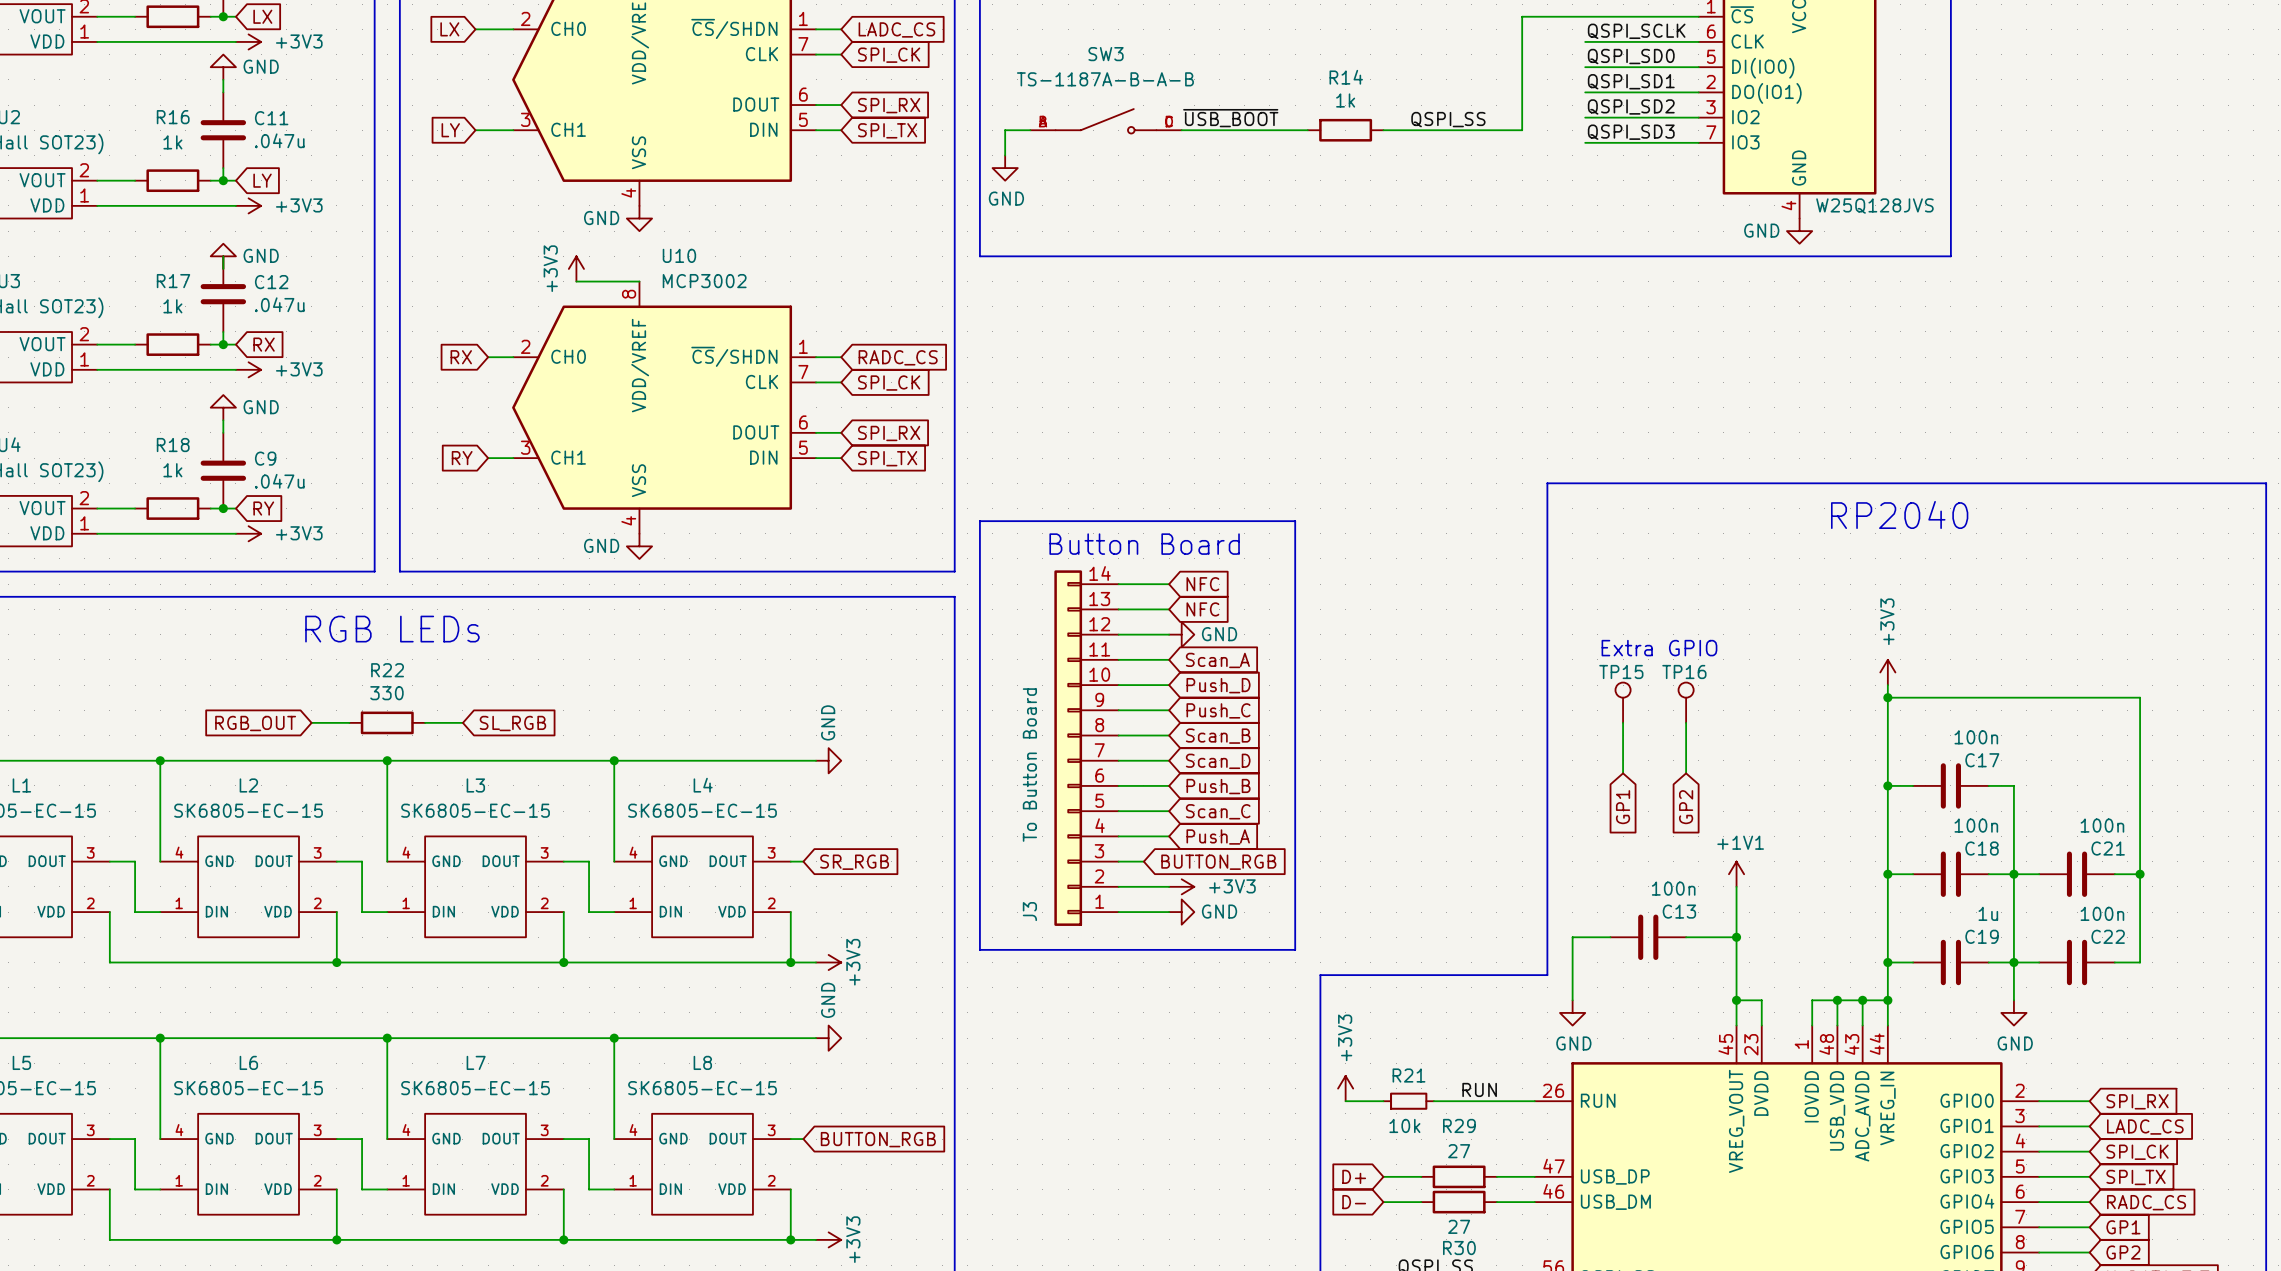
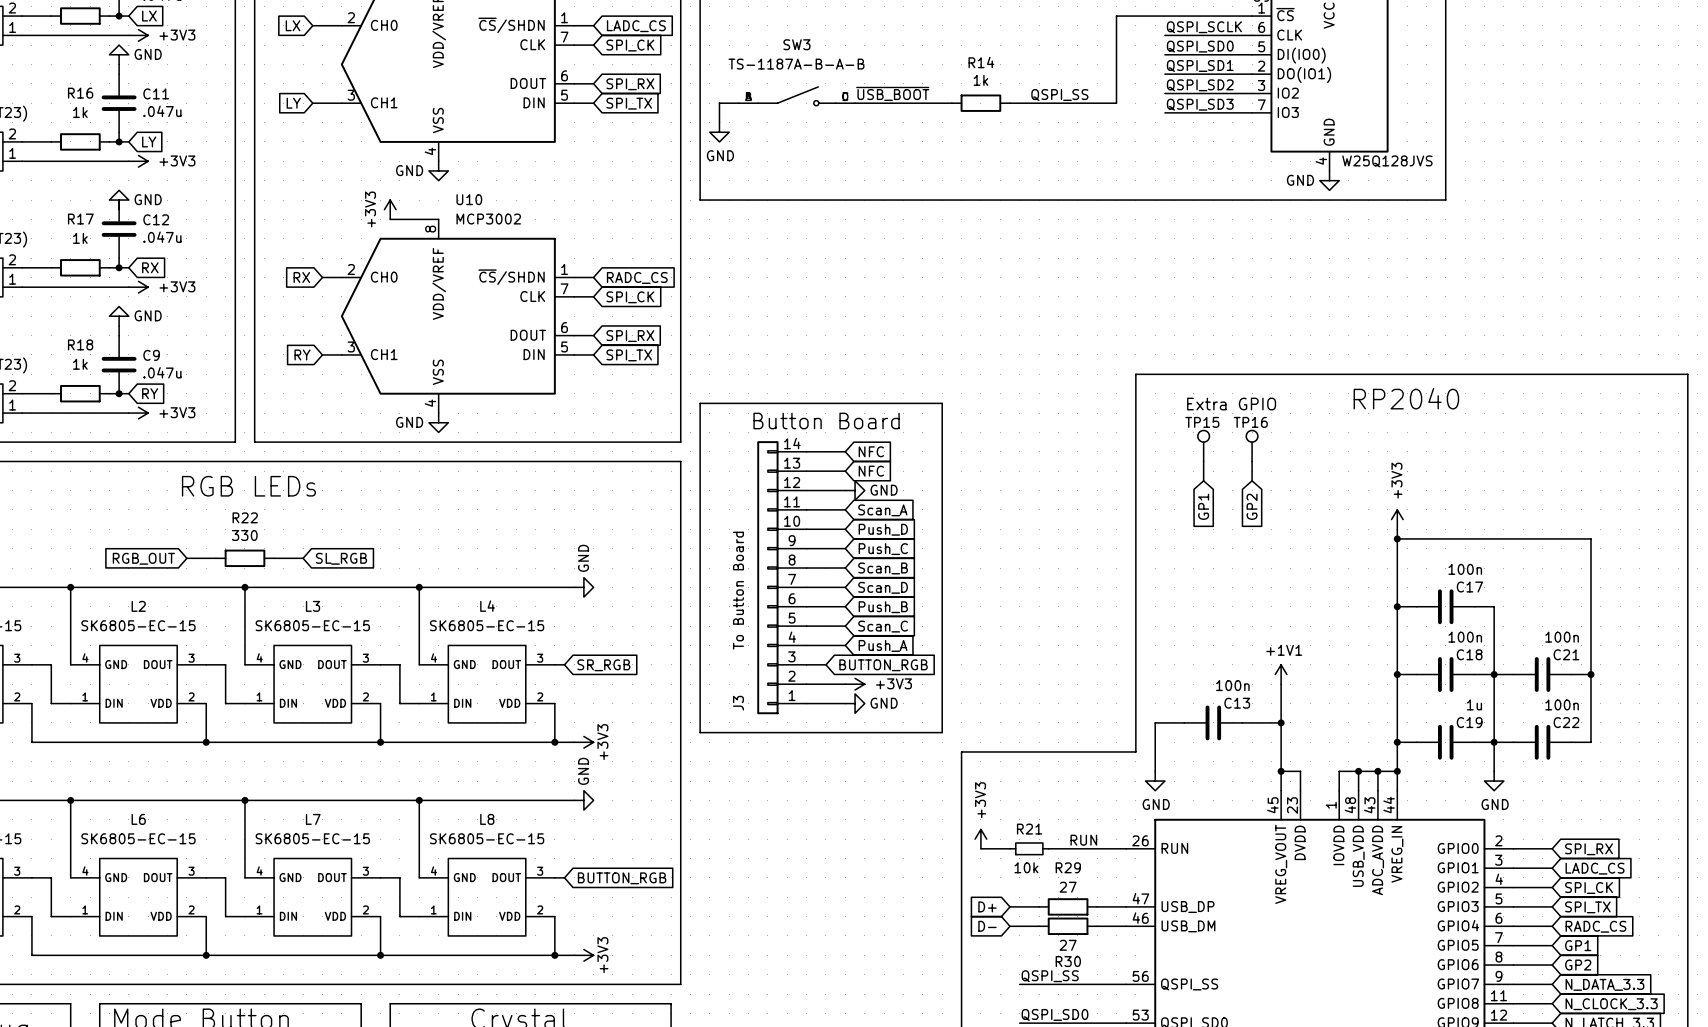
wire: none -> (1203, 461) (1203, 480)
wire: none -> (1252, 461) (1252, 480)
text position: Extra GPIO (1659, 648) -> Extra GPIO (1231, 404)
TP15 position: (1623, 702) -> (1203, 445)
TP16 position: (1686, 702) -> (1252, 445)
wire: (1623, 722) (1623, 773) -> none
wire: (1686, 722) (1686, 773) -> none
global label position: GP1 (1623, 807) -> GP1 (1203, 506)
global label position: GP2 (1686, 807) -> GP2 (1252, 506)

